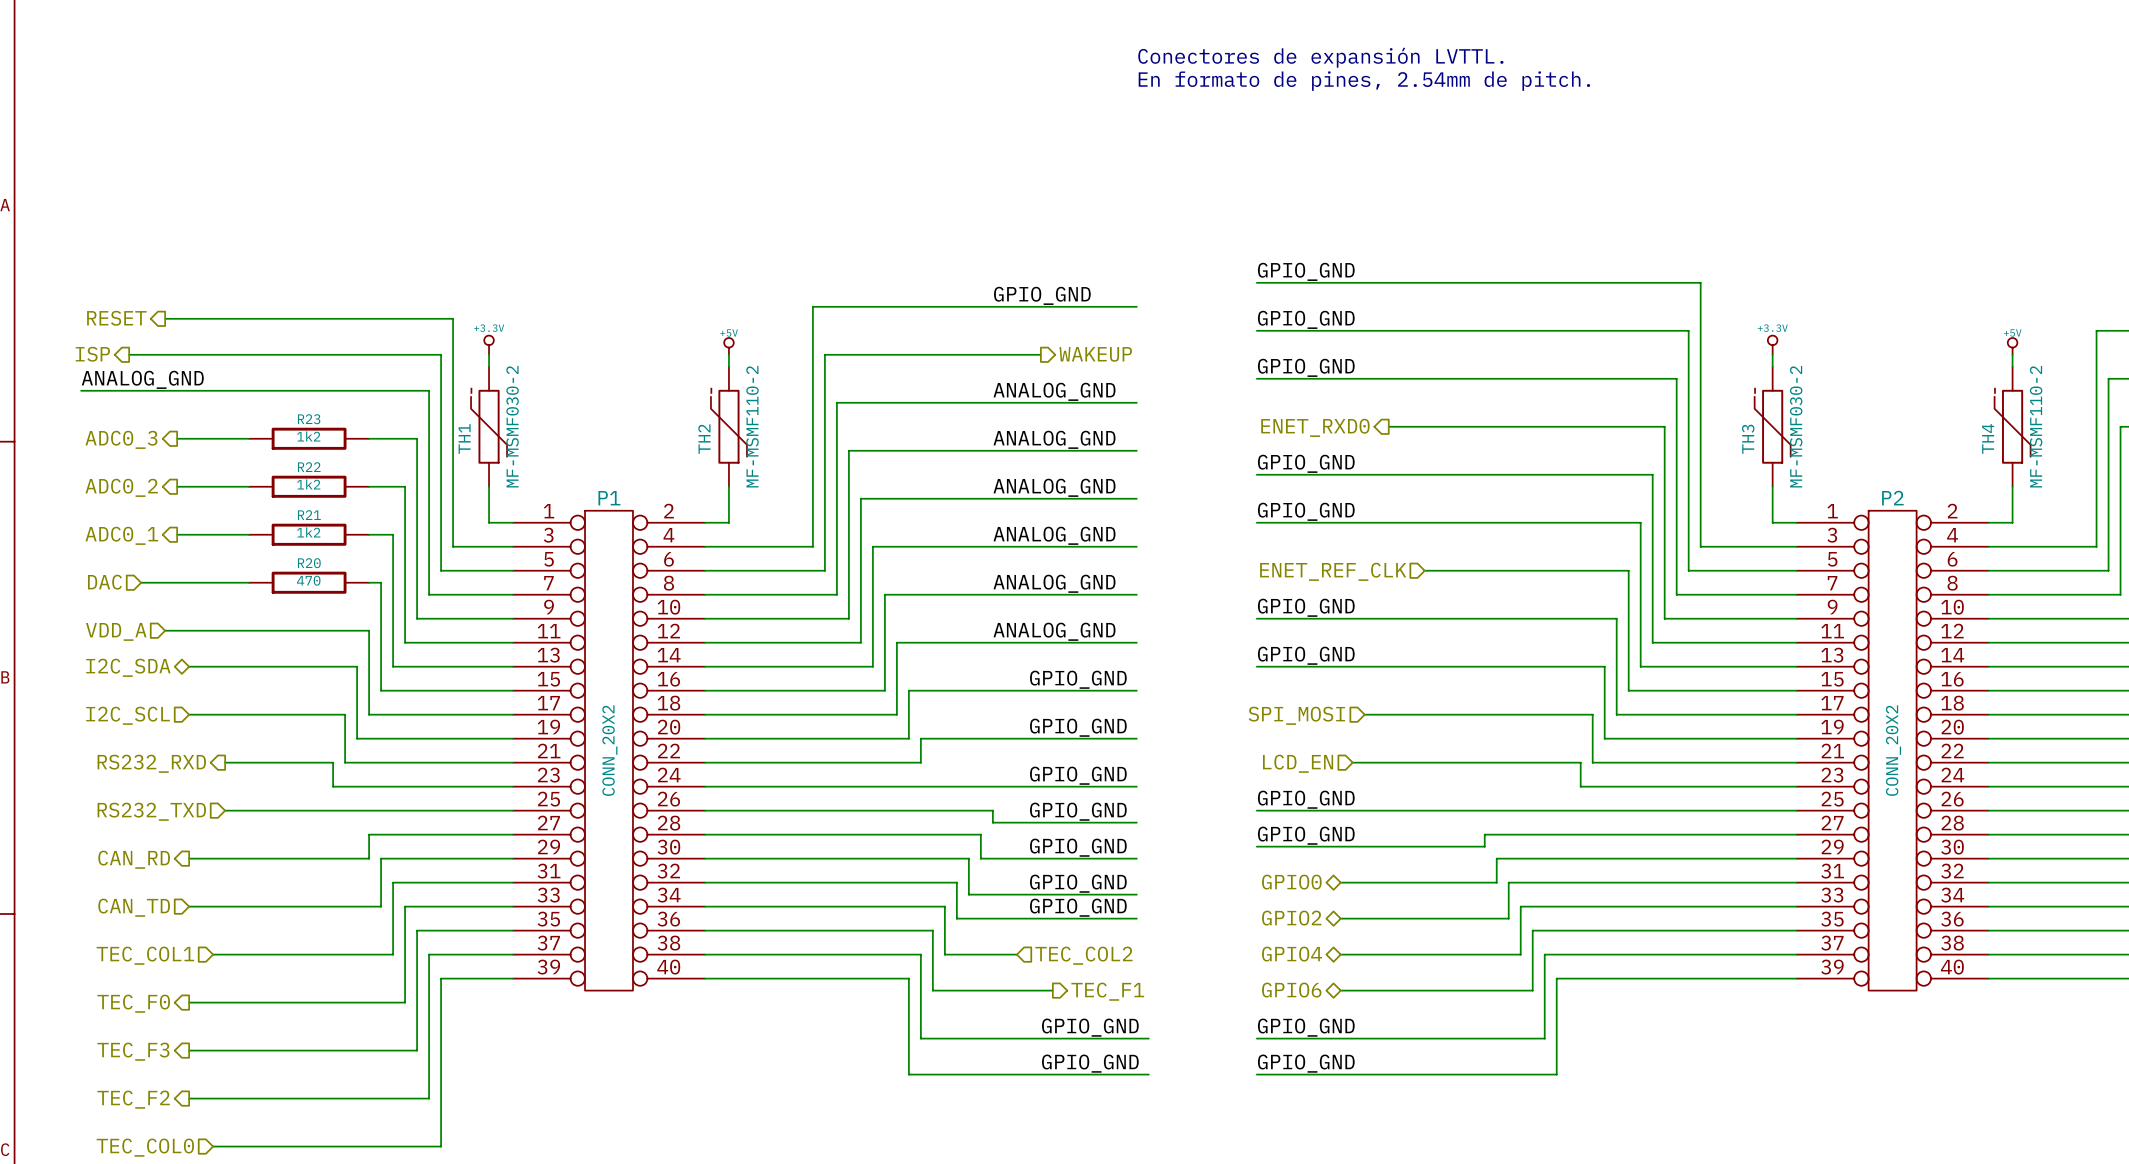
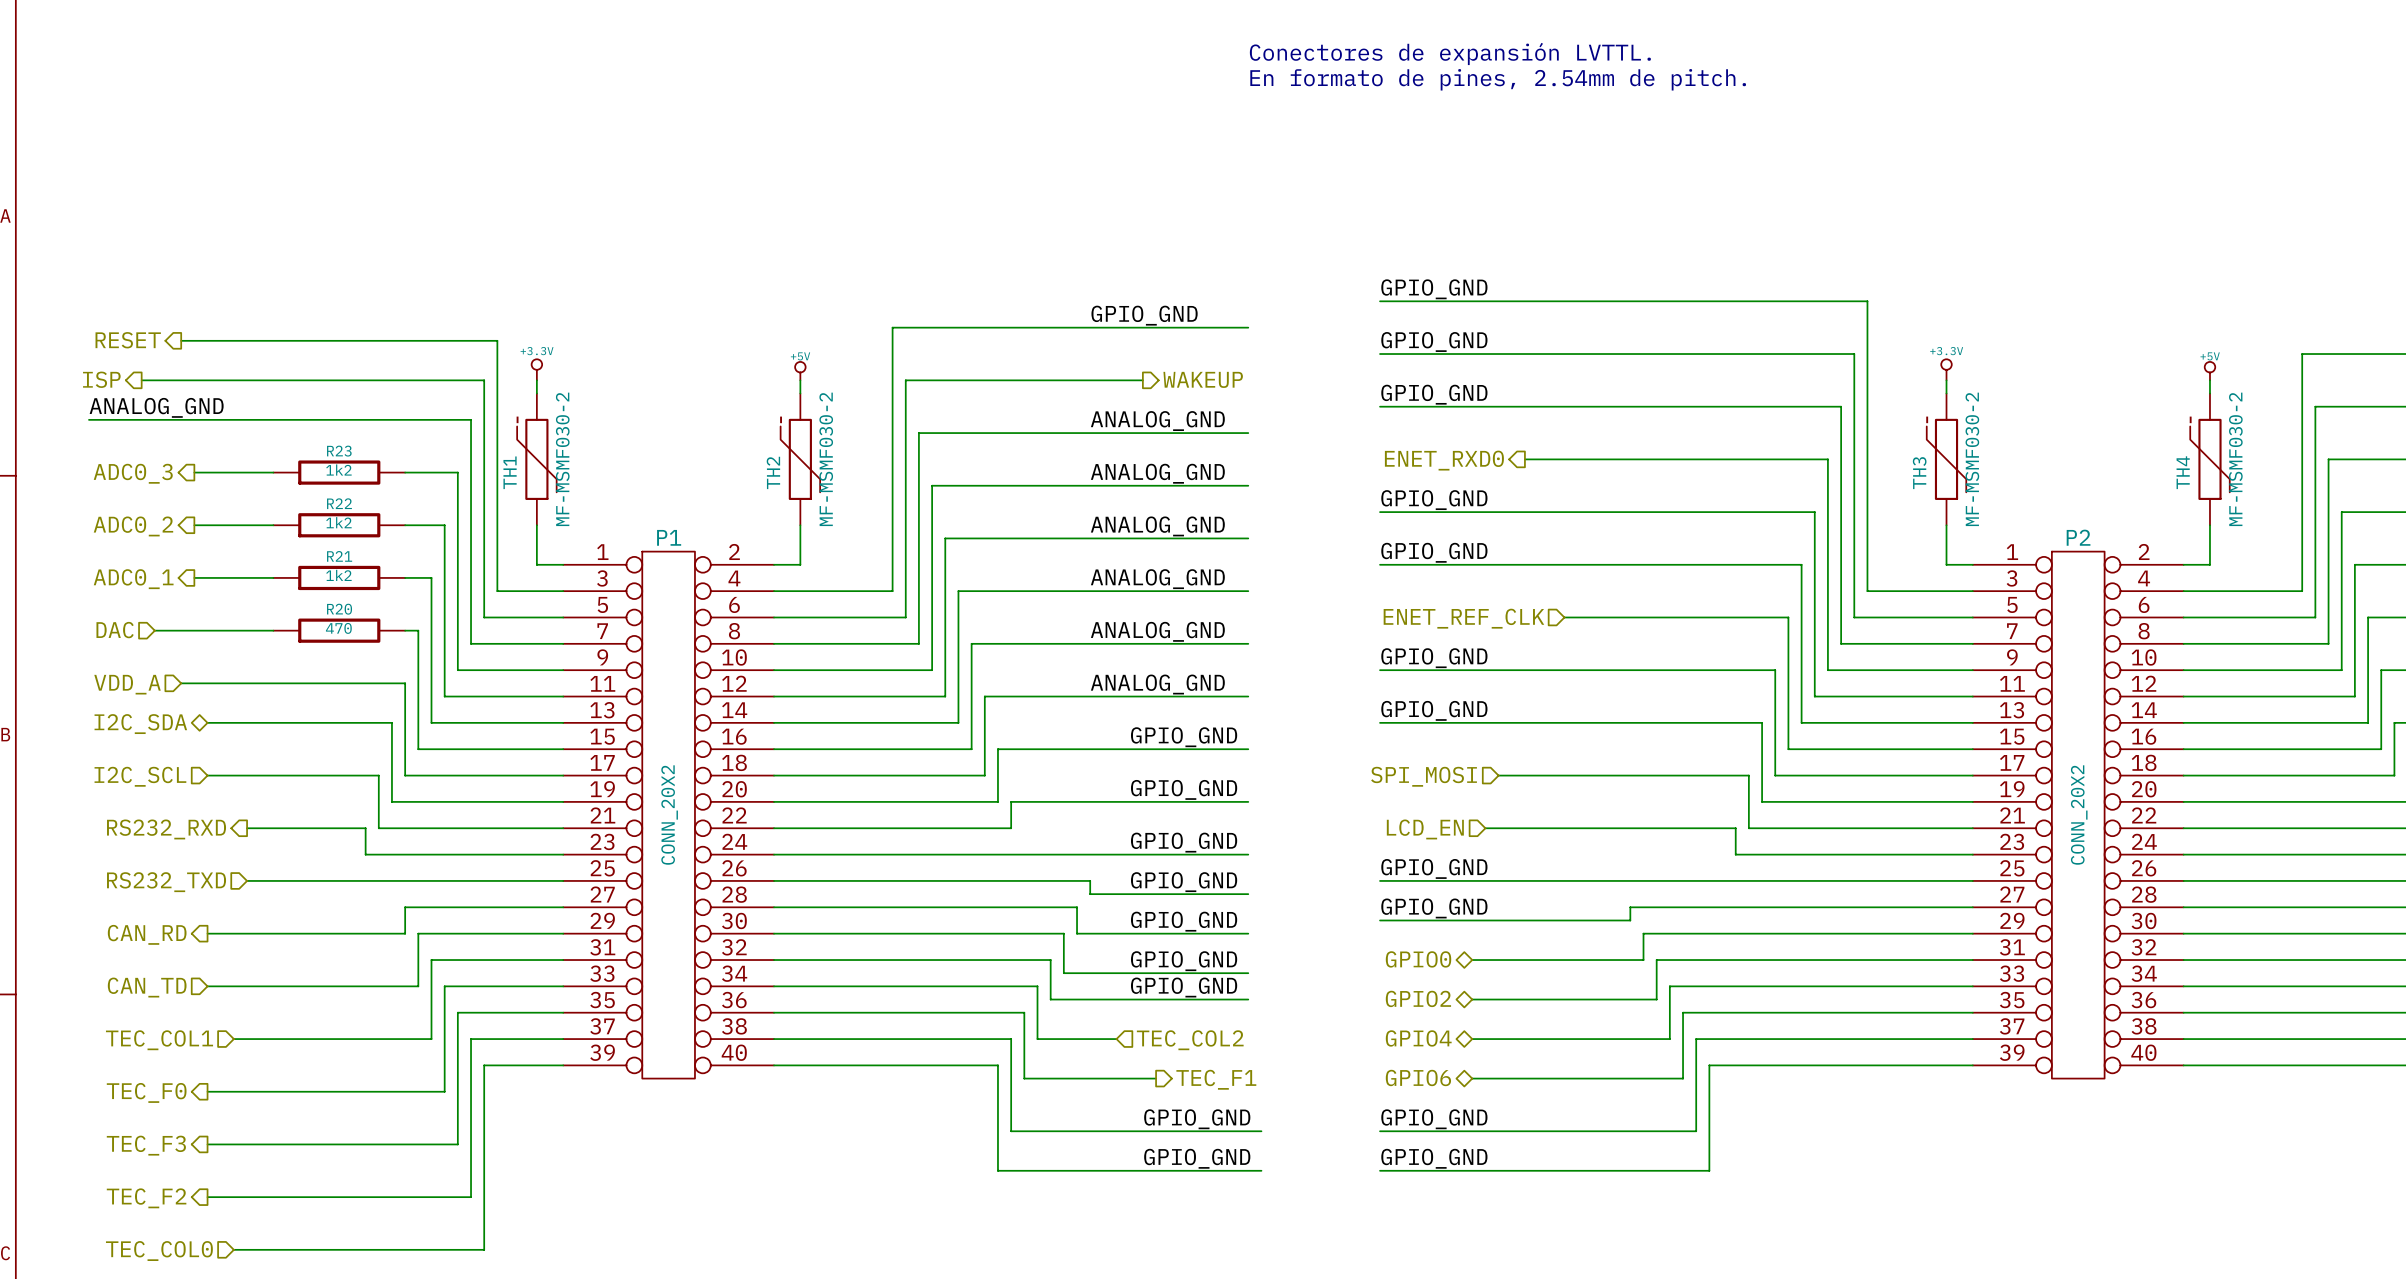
TH2 value: MF-MSMF110-2 (752, 426) -> MF-MSMF030-2 (826, 459)
TH4 value: MF-MSMF110-2 (2036, 426) -> MF-MSMF030-2 (2235, 459)

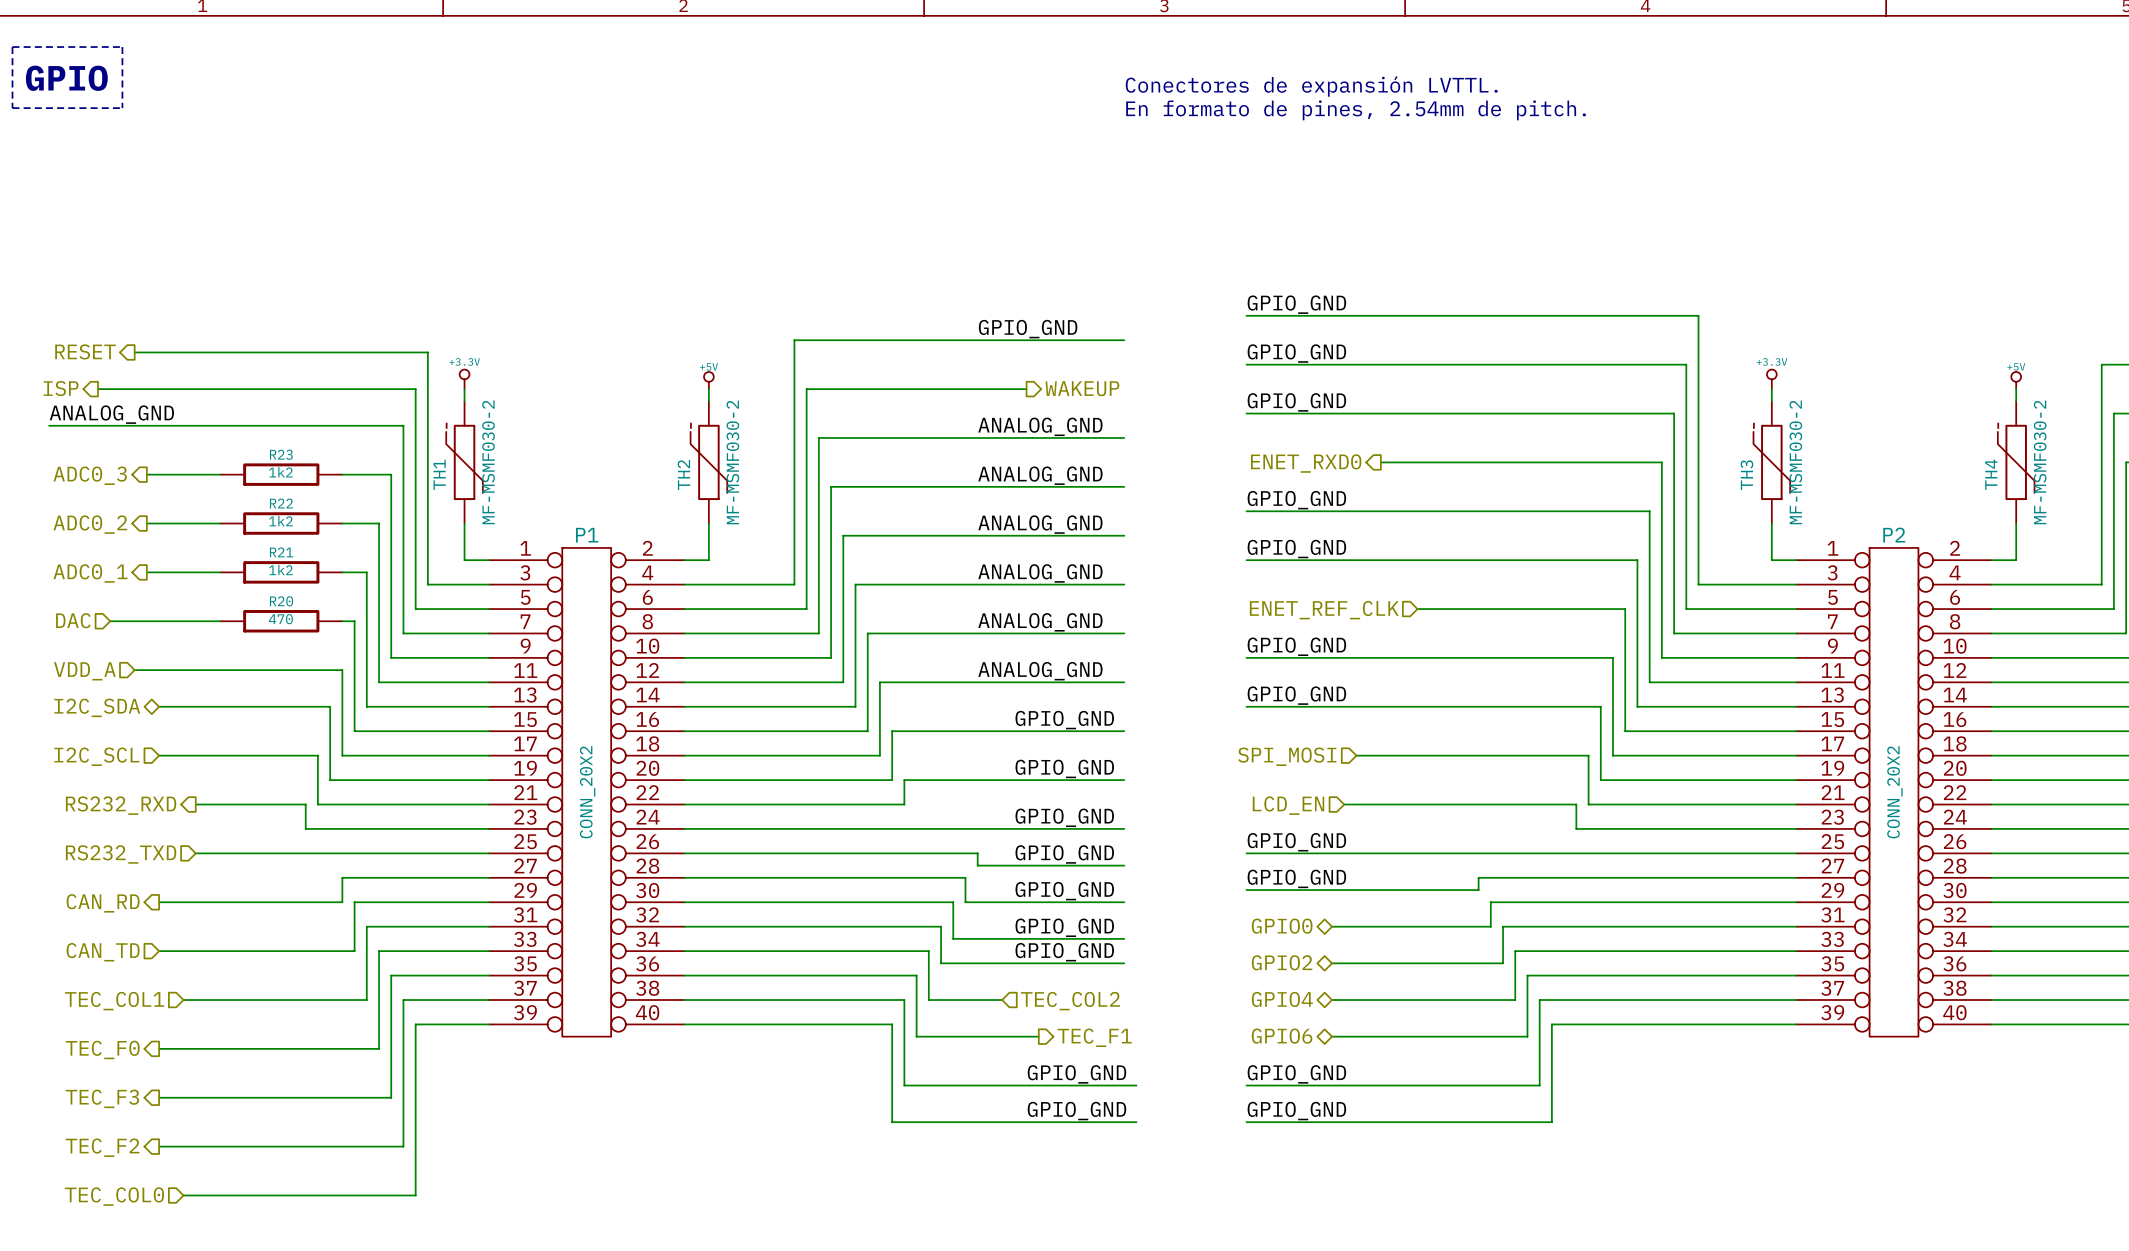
line: none -> (12, 47) (122, 47) (122, 108) (12, 108) (12, 47)
text: none -> GPIO (66, 78)

